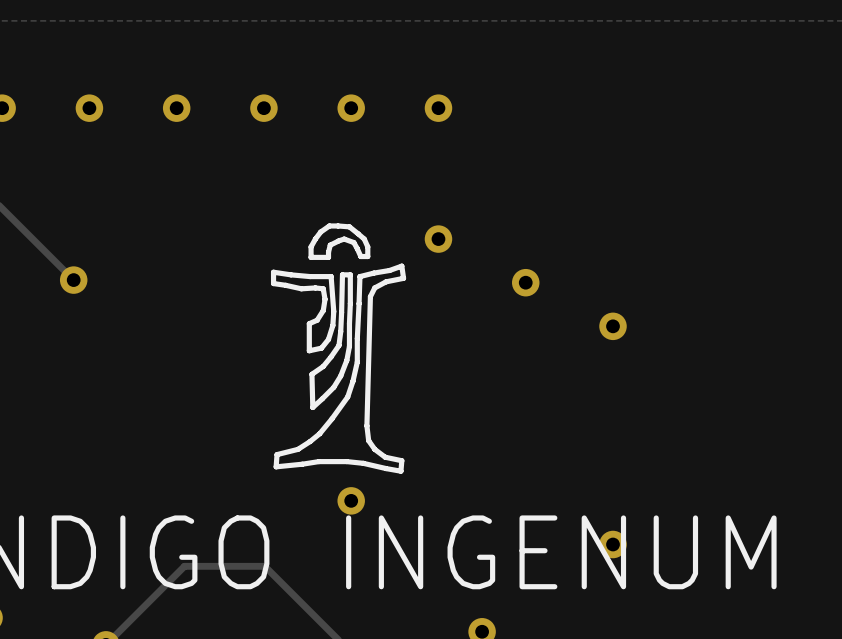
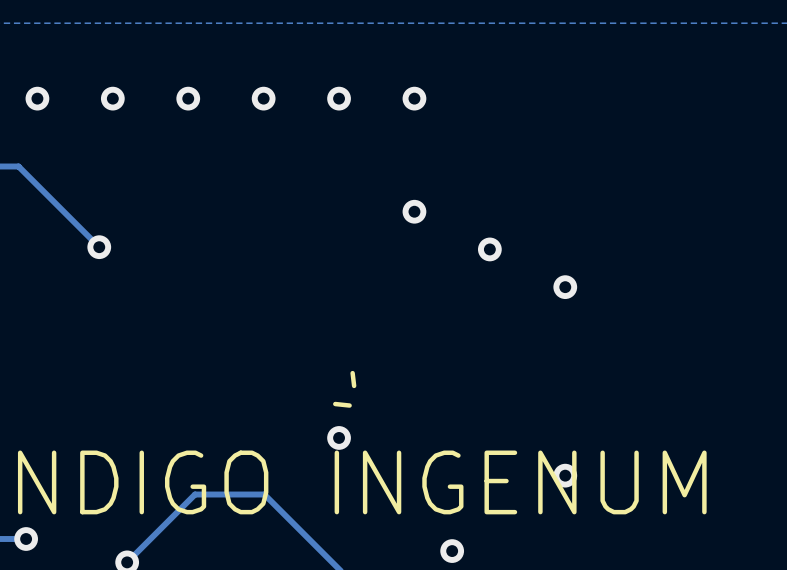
line: (338, 225) (349, 226) (364, 239) (367, 246) (367, 256) (360, 256) (353, 242) (344, 239) (330, 245) (328, 257) (311, 257) (311, 246) (320, 232) (329, 225) (338, 225) -> none
line: (273, 272) (273, 283) (301, 288) (323, 288) (325, 299) (323, 310) (317, 320) (309, 323) (309, 350) (321, 348) (328, 339) (332, 325) (331, 276) (310, 276) (273, 272) -> none
line: (350, 274) (342, 274) (338, 345) (323, 366) (311, 374) (312, 407) (333, 387) (346, 360) (349, 346) (350, 274) -> none
line: (366, 425) (370, 296) (374, 287) (386, 281) (403, 278) (401, 266) (359, 276) (357, 362) (347, 397) (319, 433) (310, 441) (297, 449) (277, 454) (276, 466) (318, 461) (346, 461) -> none
line: (368, 440) (374, 449) (385, 457) (401, 460) (400, 471) (363, 463) -> none

